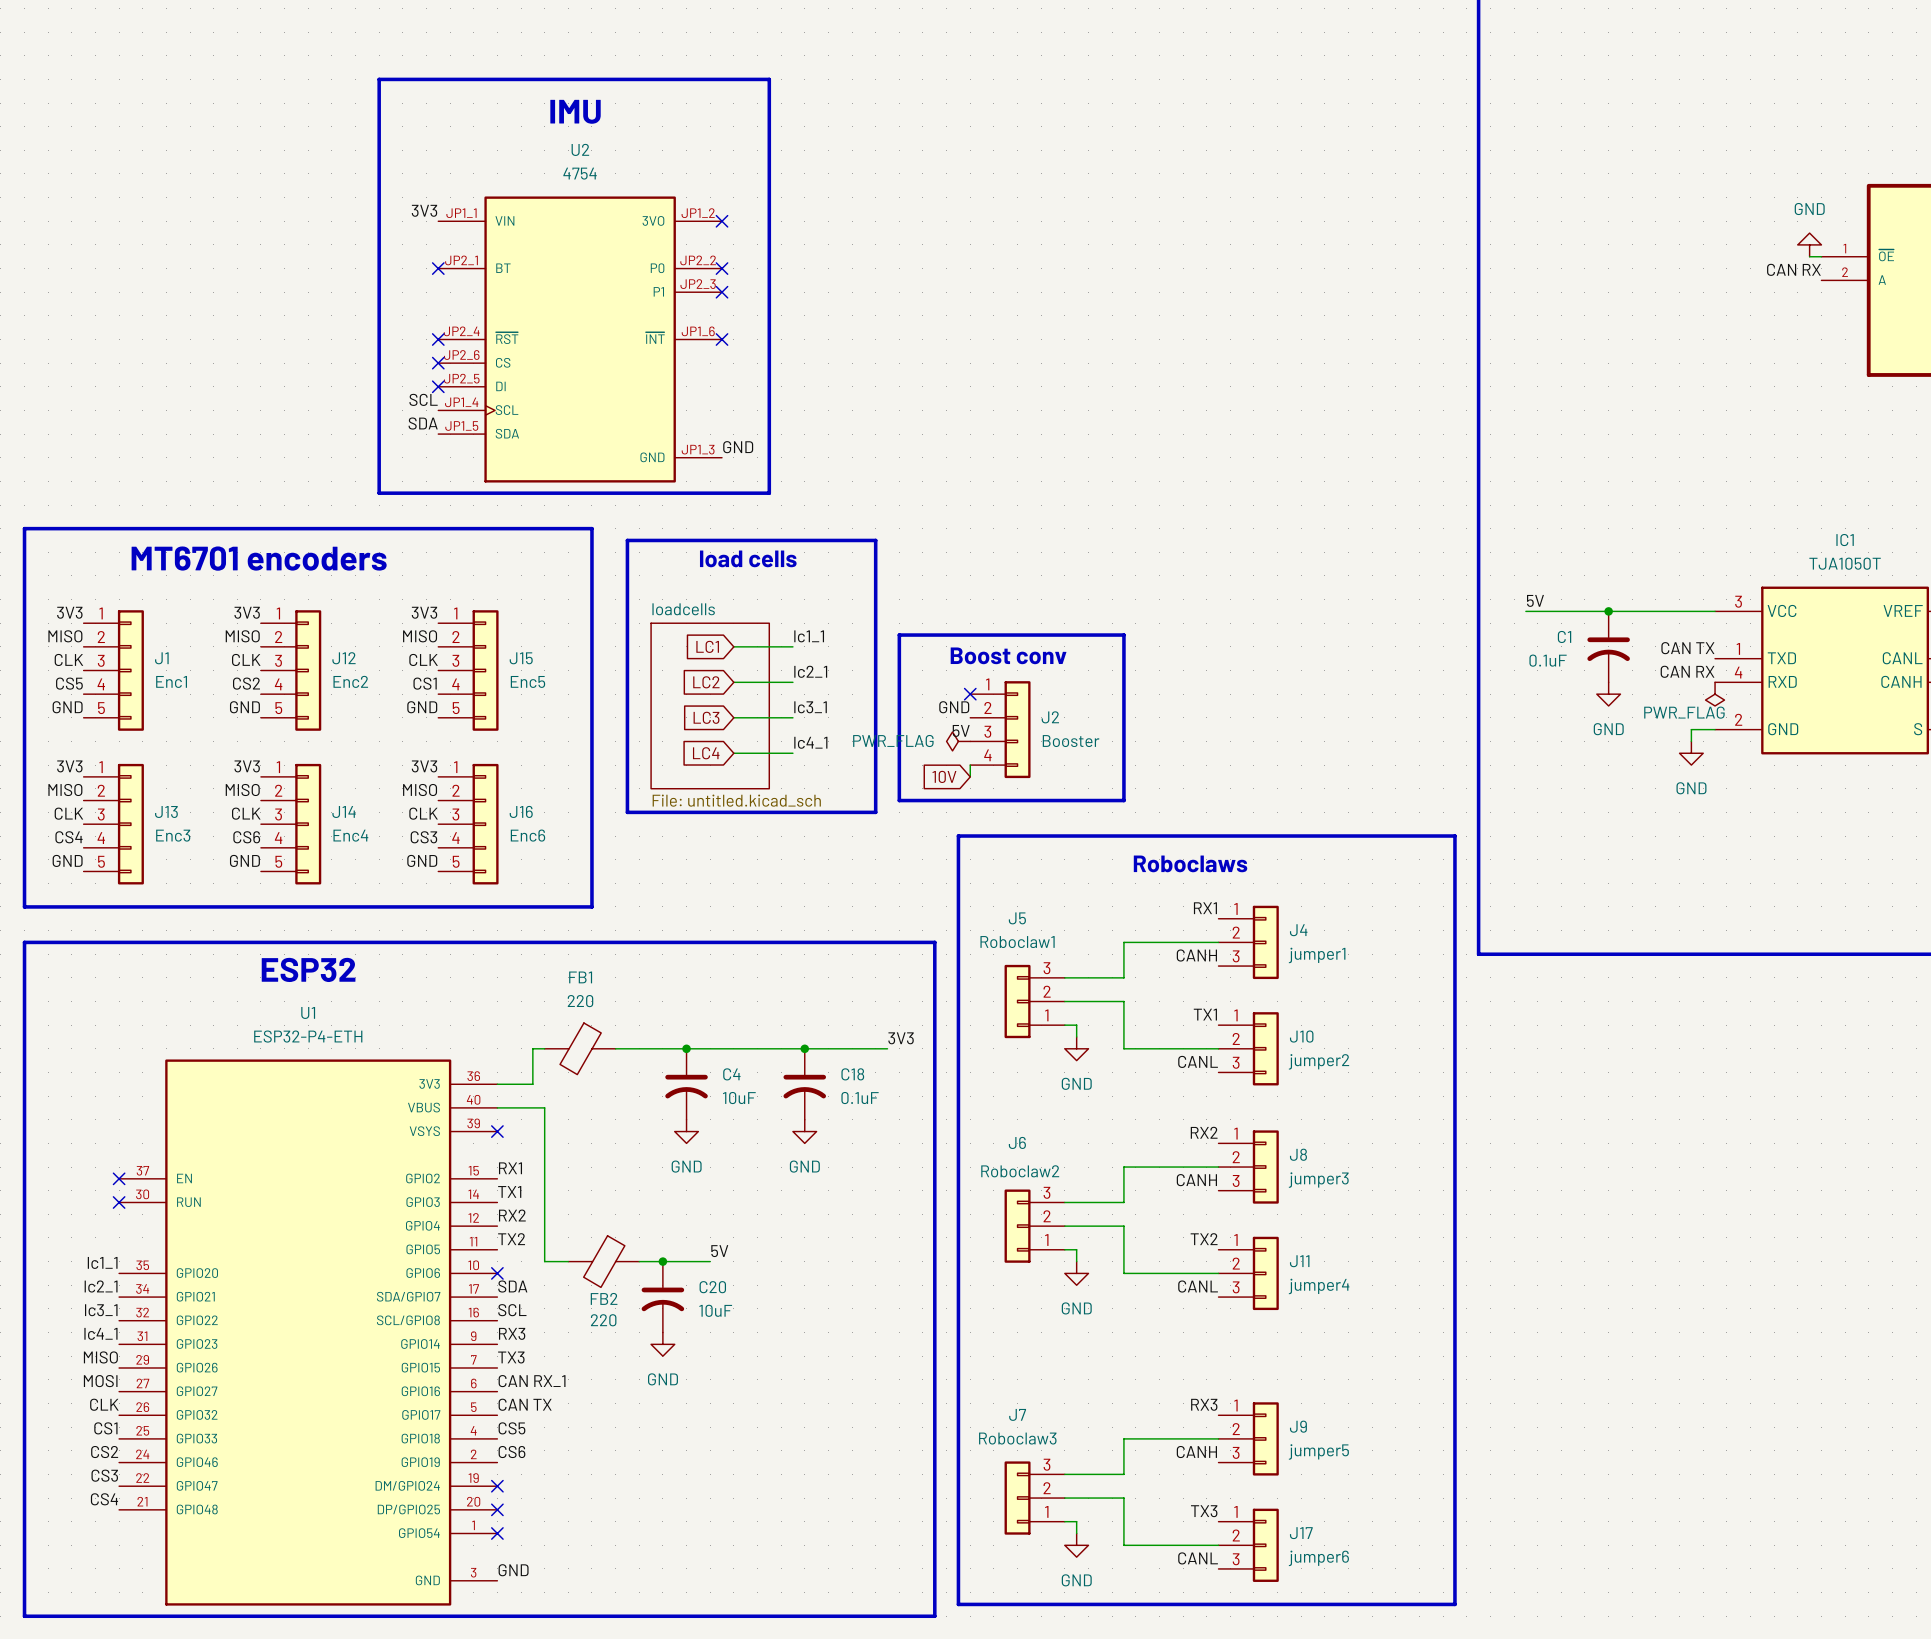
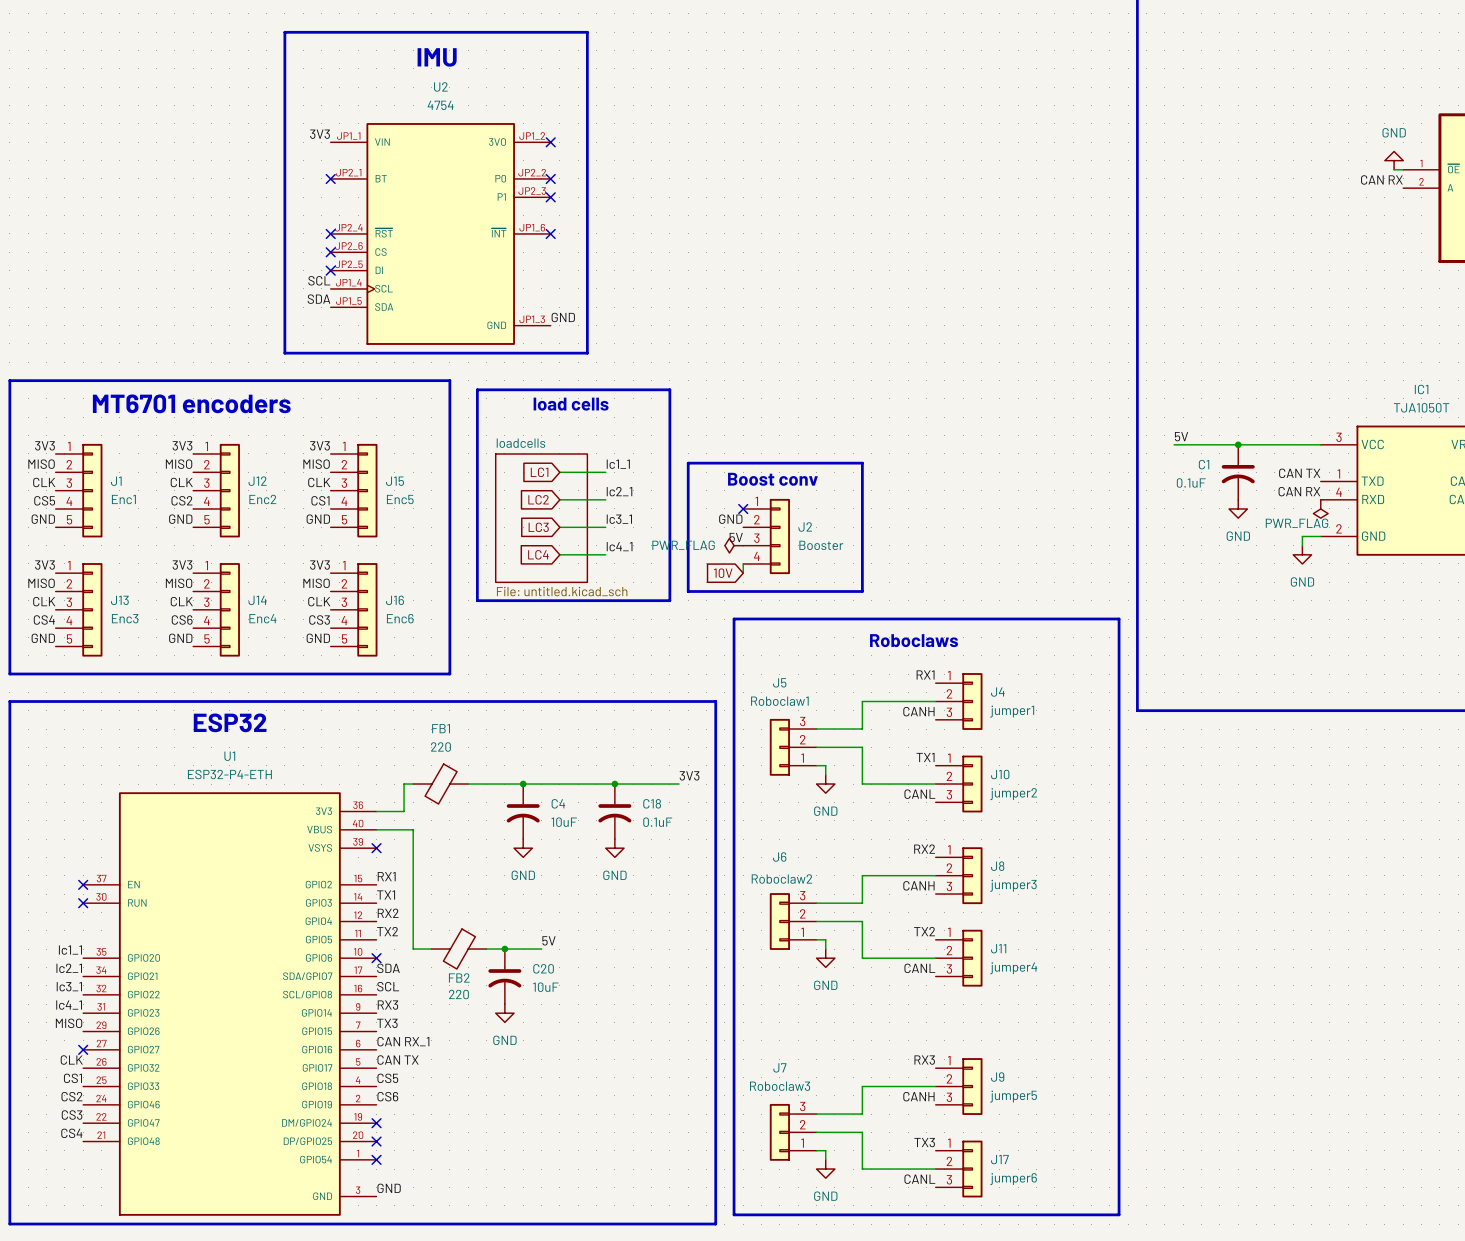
label: MOSI (100, 1381) -> none
no-connect mark: none -> (83, 1049)

